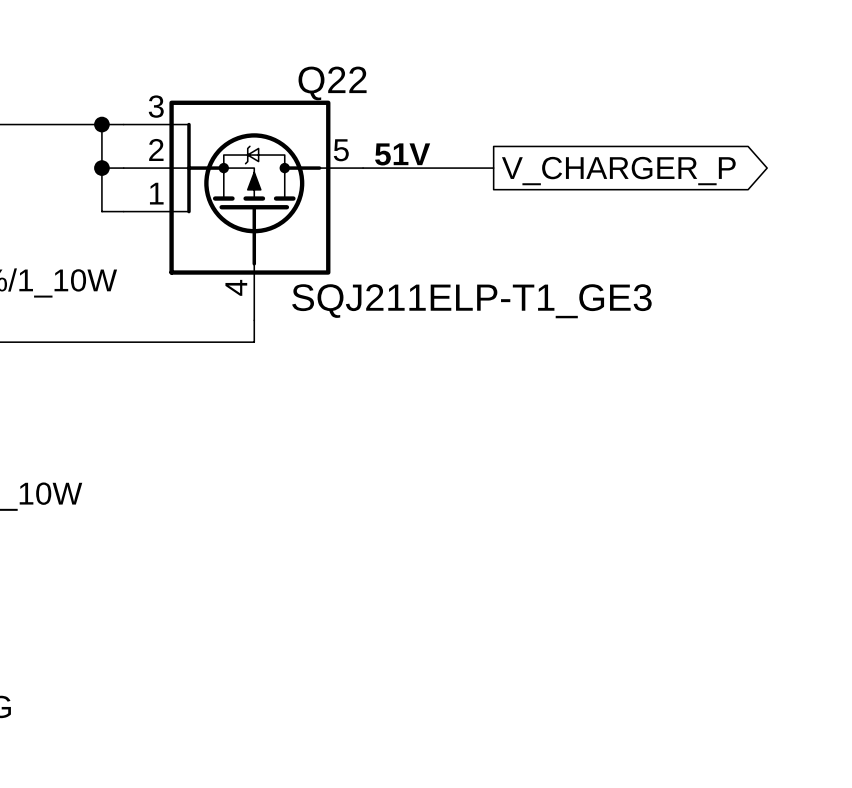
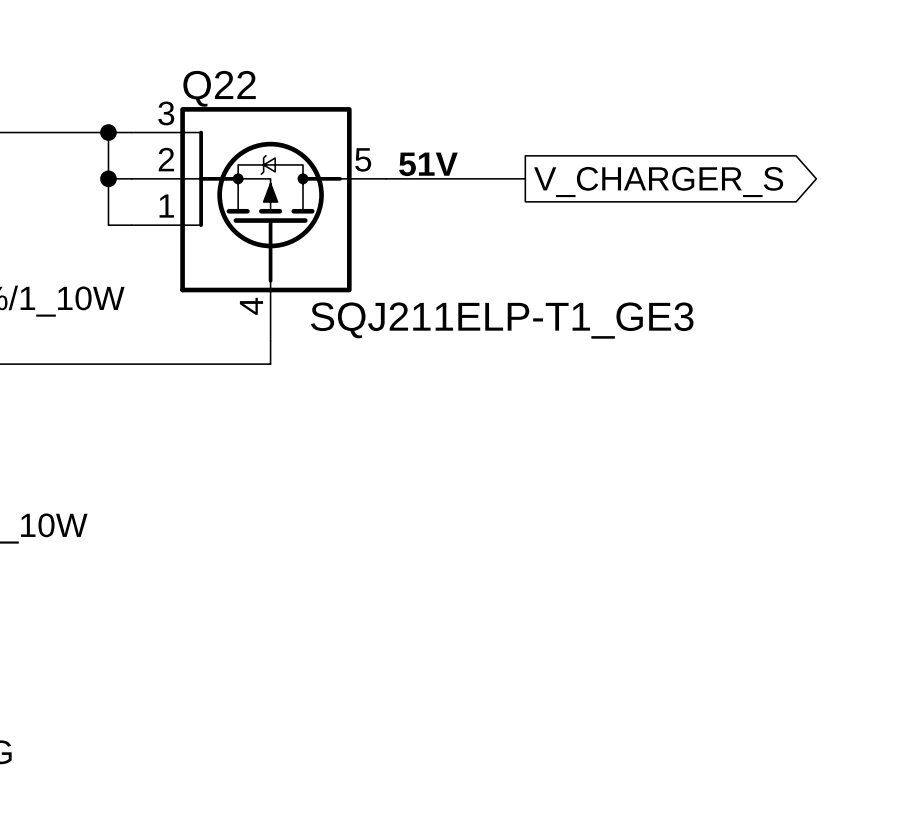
Q22 name position: Q22 (332, 83) -> Q22 (219, 88)
global label: V_CHARGER_P (618, 171) -> V_CHARGER_S (658, 182)

